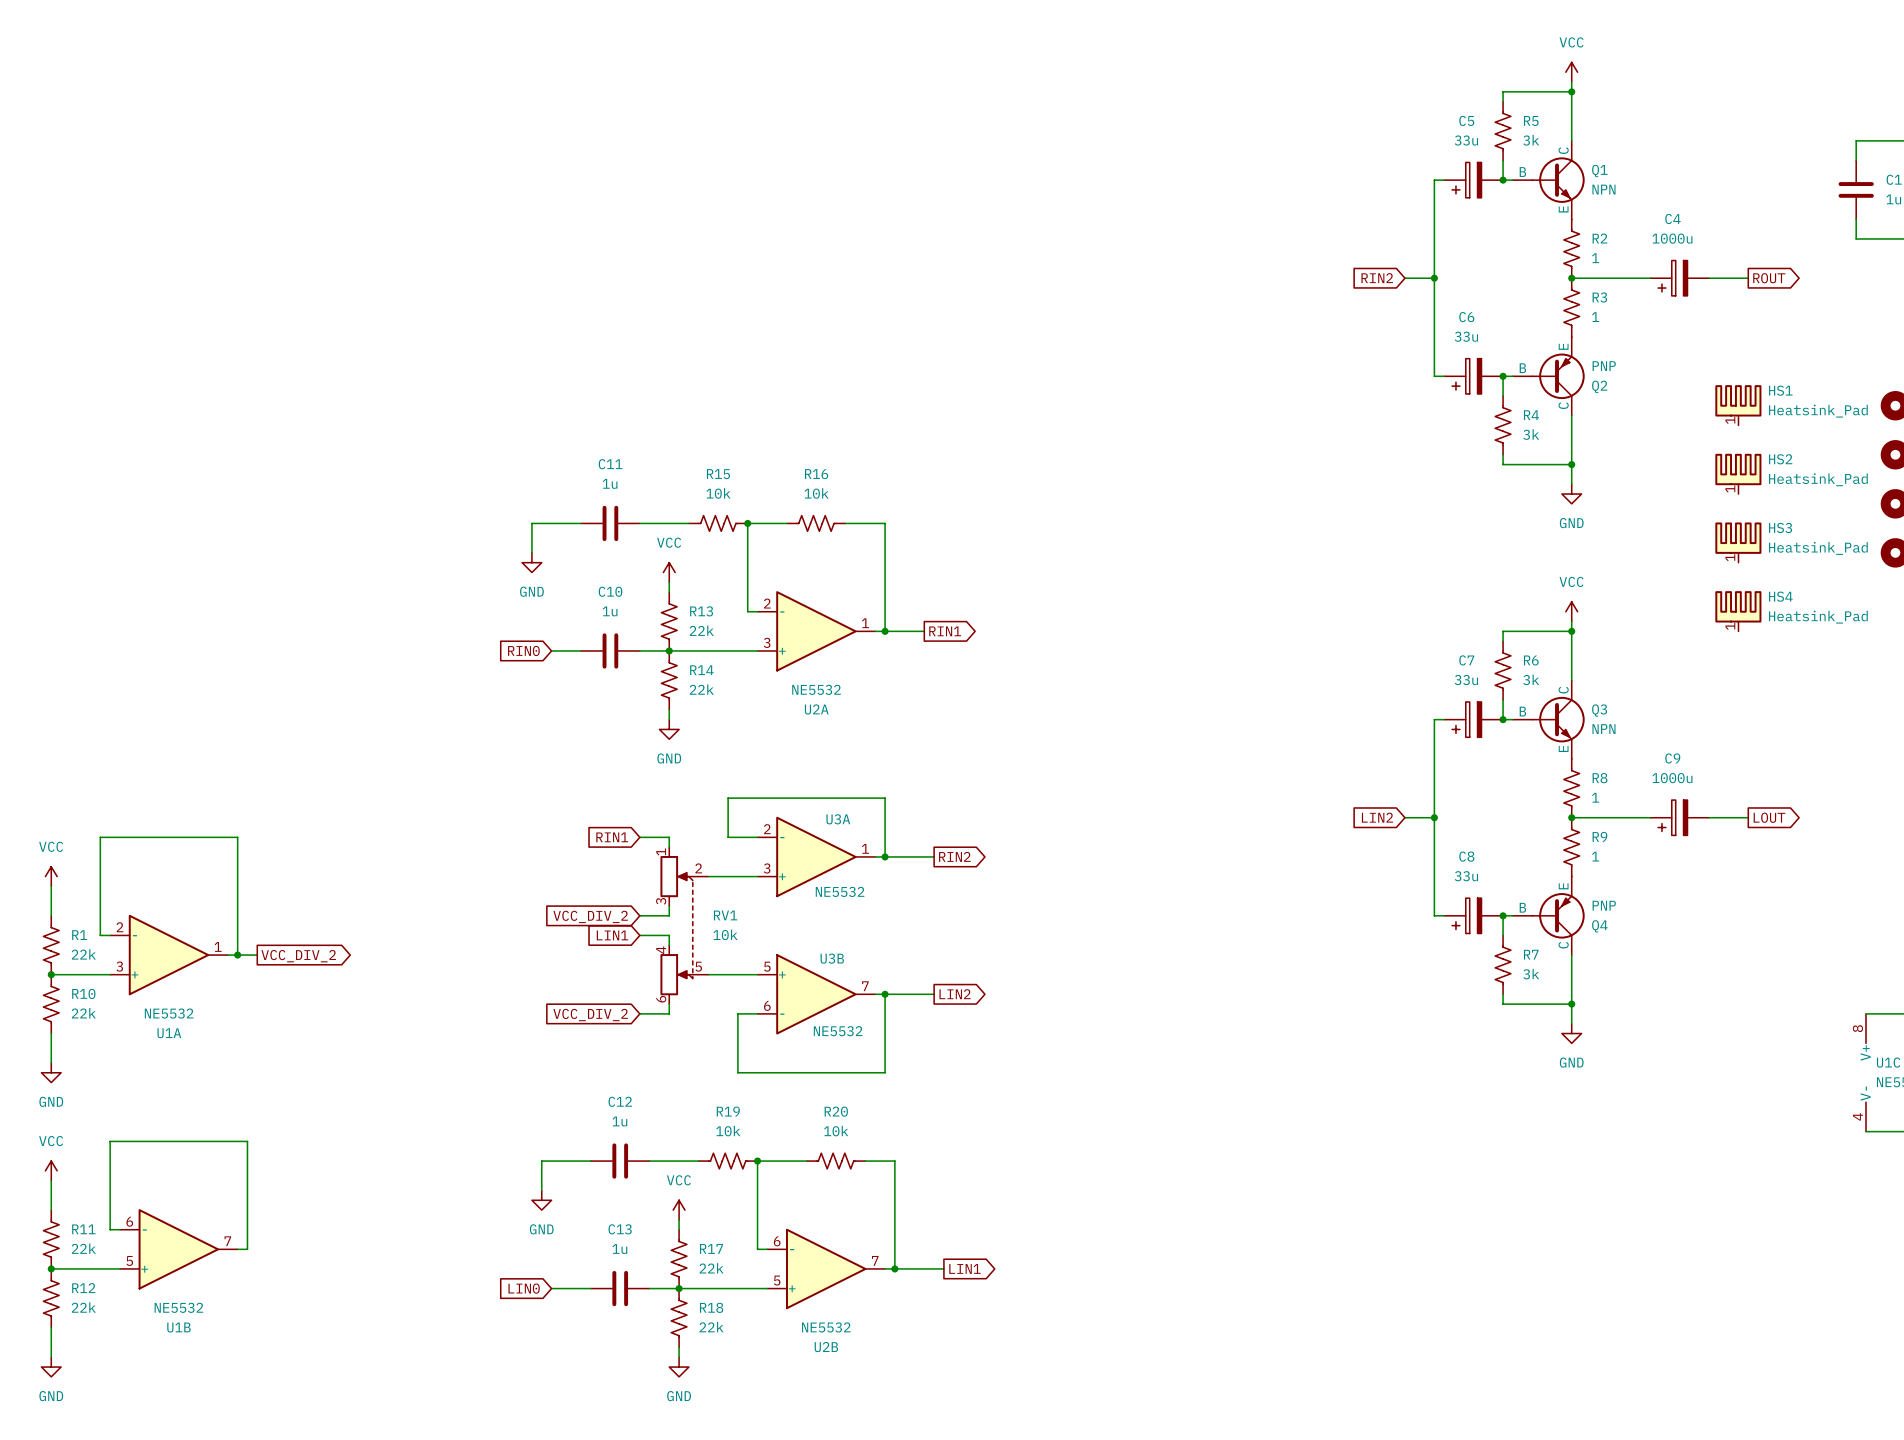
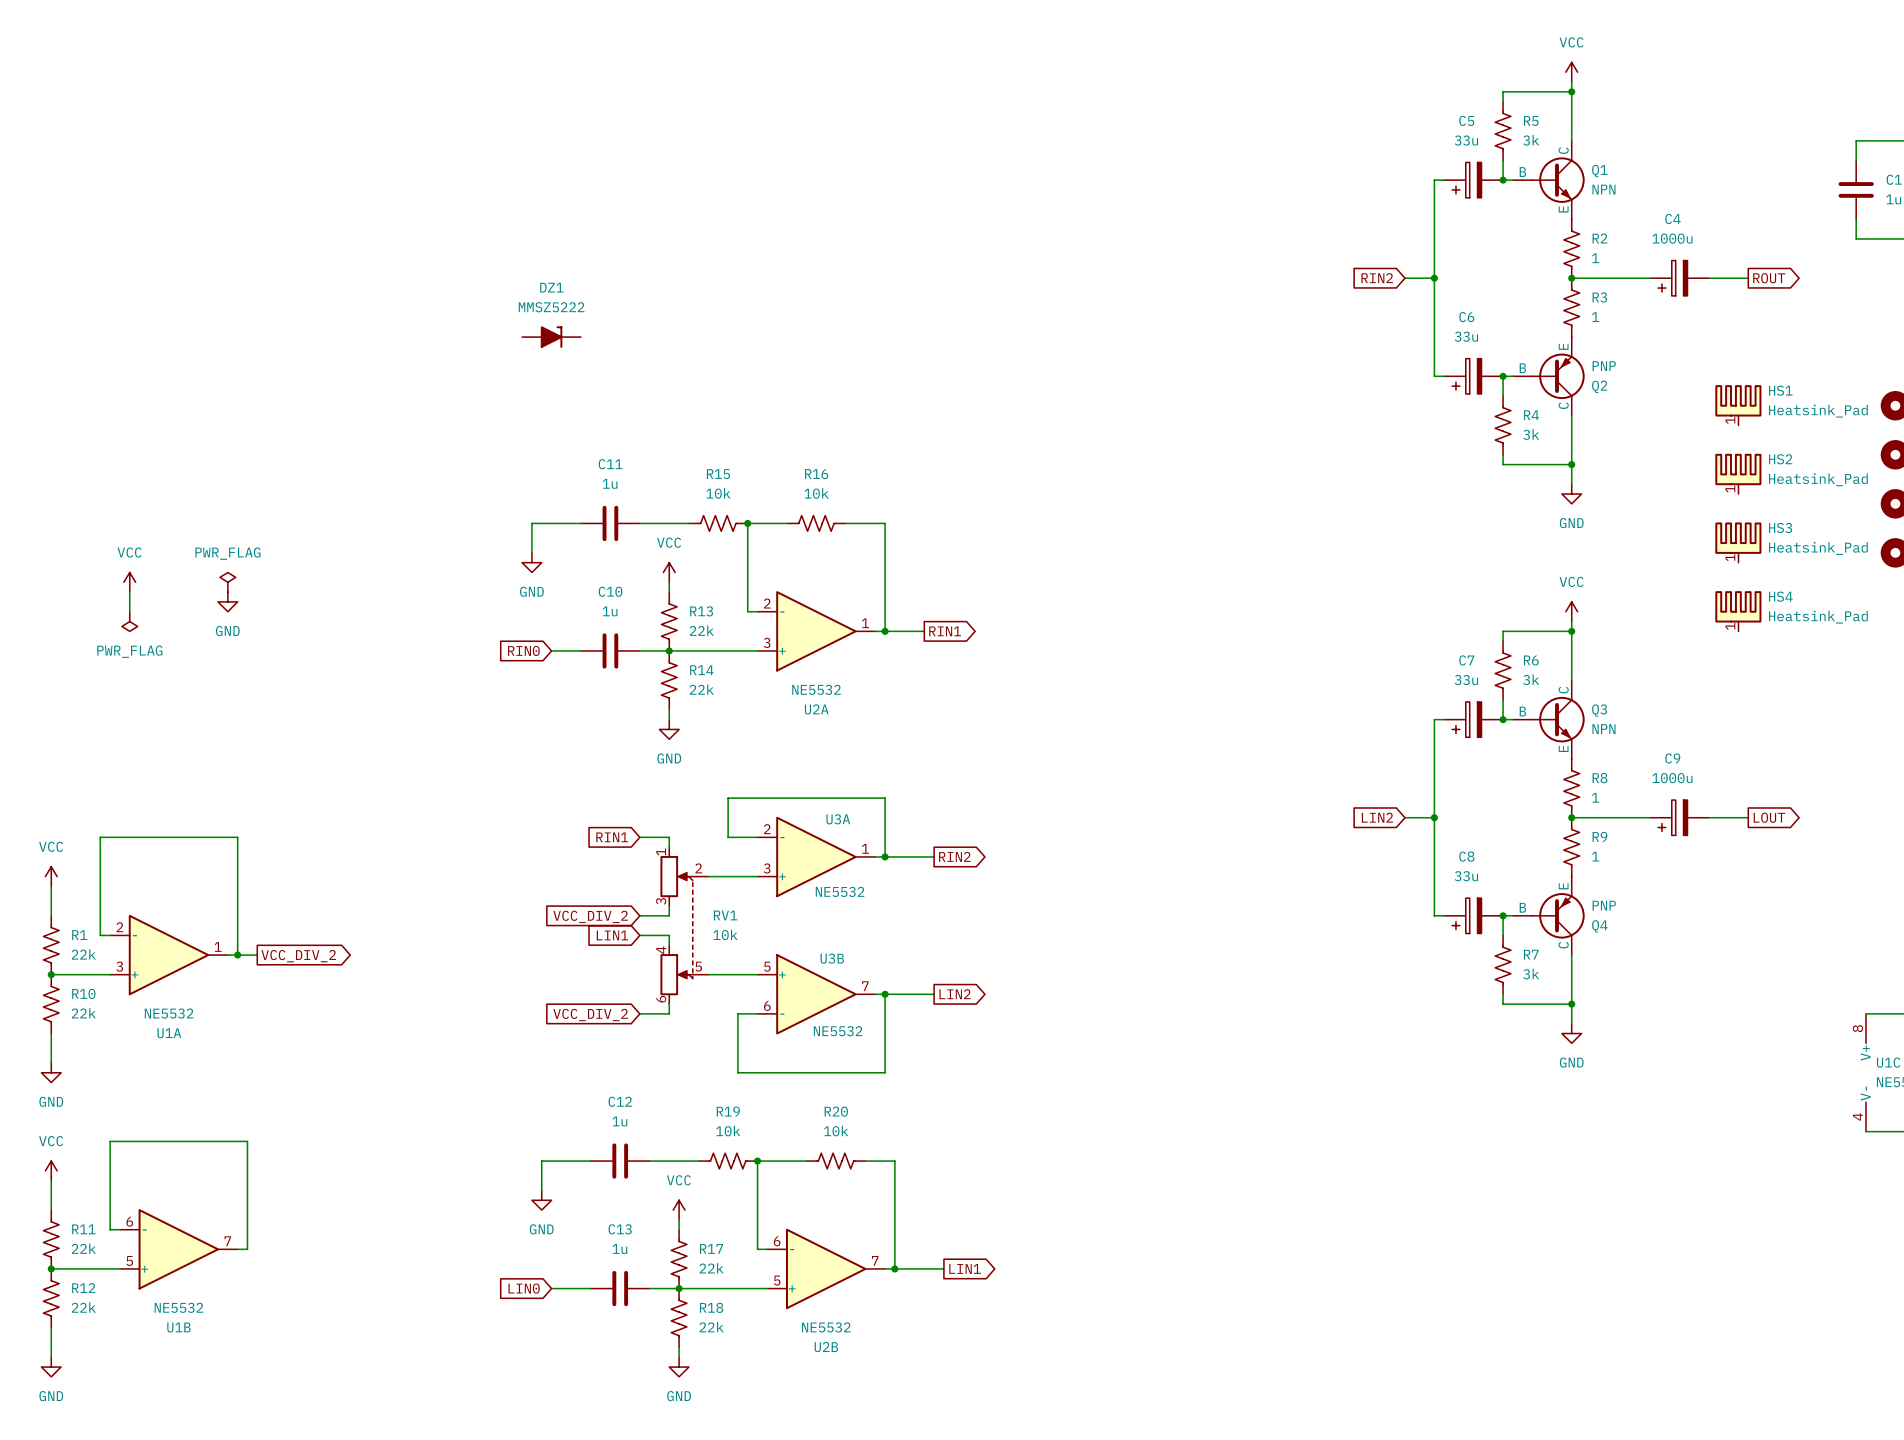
DZ1: none -> MMSZ5222 (551, 337)
power symbol: none -> VCC (129, 582)
power symbol: none -> PWR_FLAG (227, 582)
wire: none -> (129, 592) (129, 611)
power symbol: none -> GND (227, 601)
power symbol: none -> PWR_FLAG (129, 621)

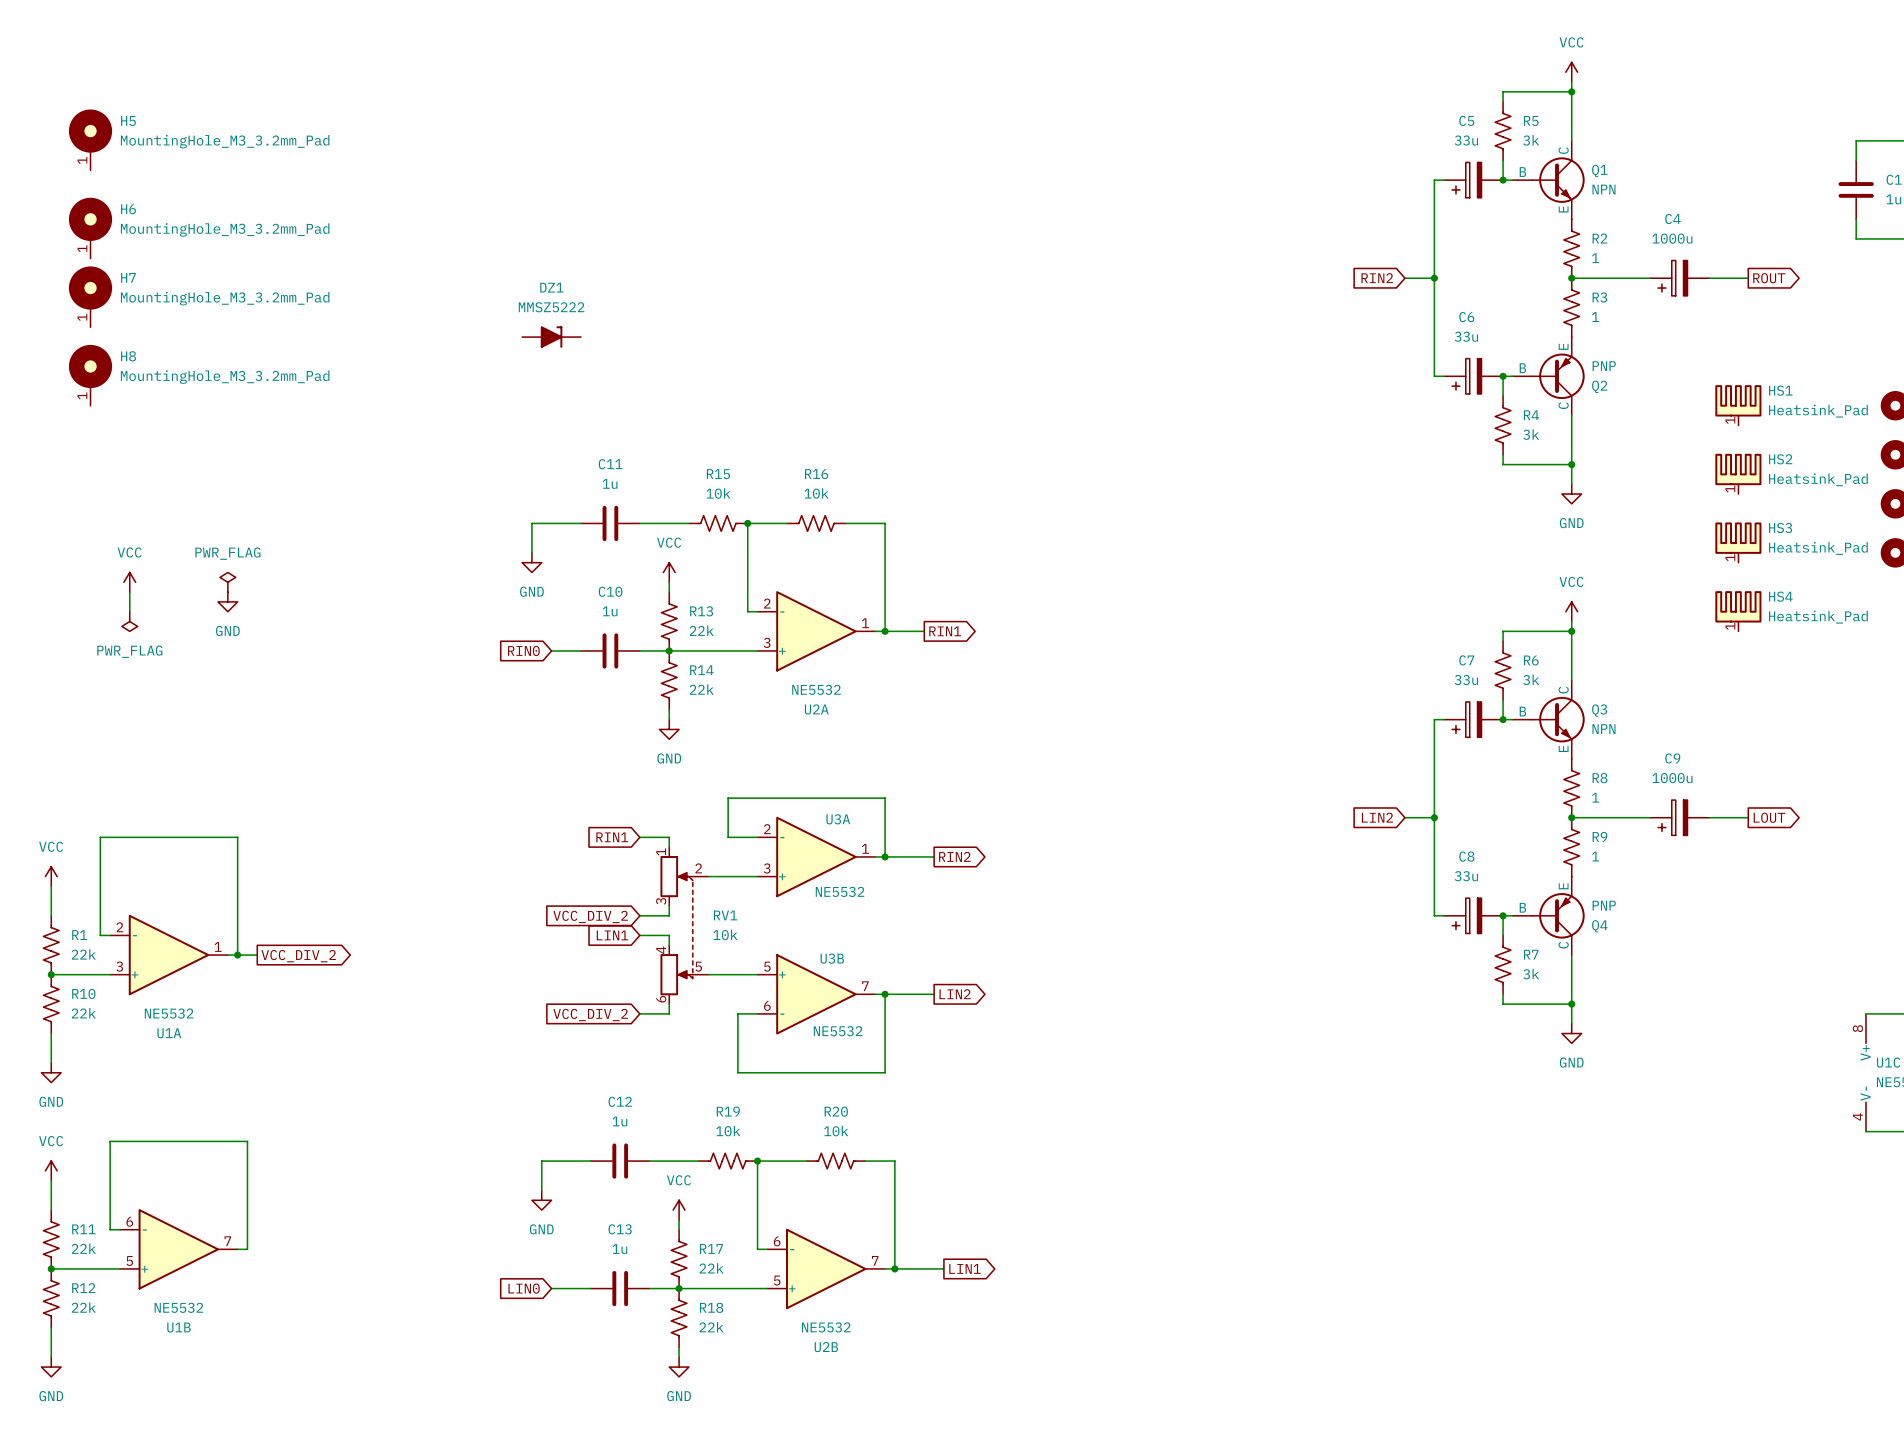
H5: none -> MountingHole_M3_3.2mm_Pad (90, 139)
H6: none -> MountingHole_M3_3.2mm_Pad (90, 228)
H7: none -> MountingHole_M3_3.2mm_Pad (90, 296)
H8: none -> MountingHole_M3_3.2mm_Pad (90, 375)

